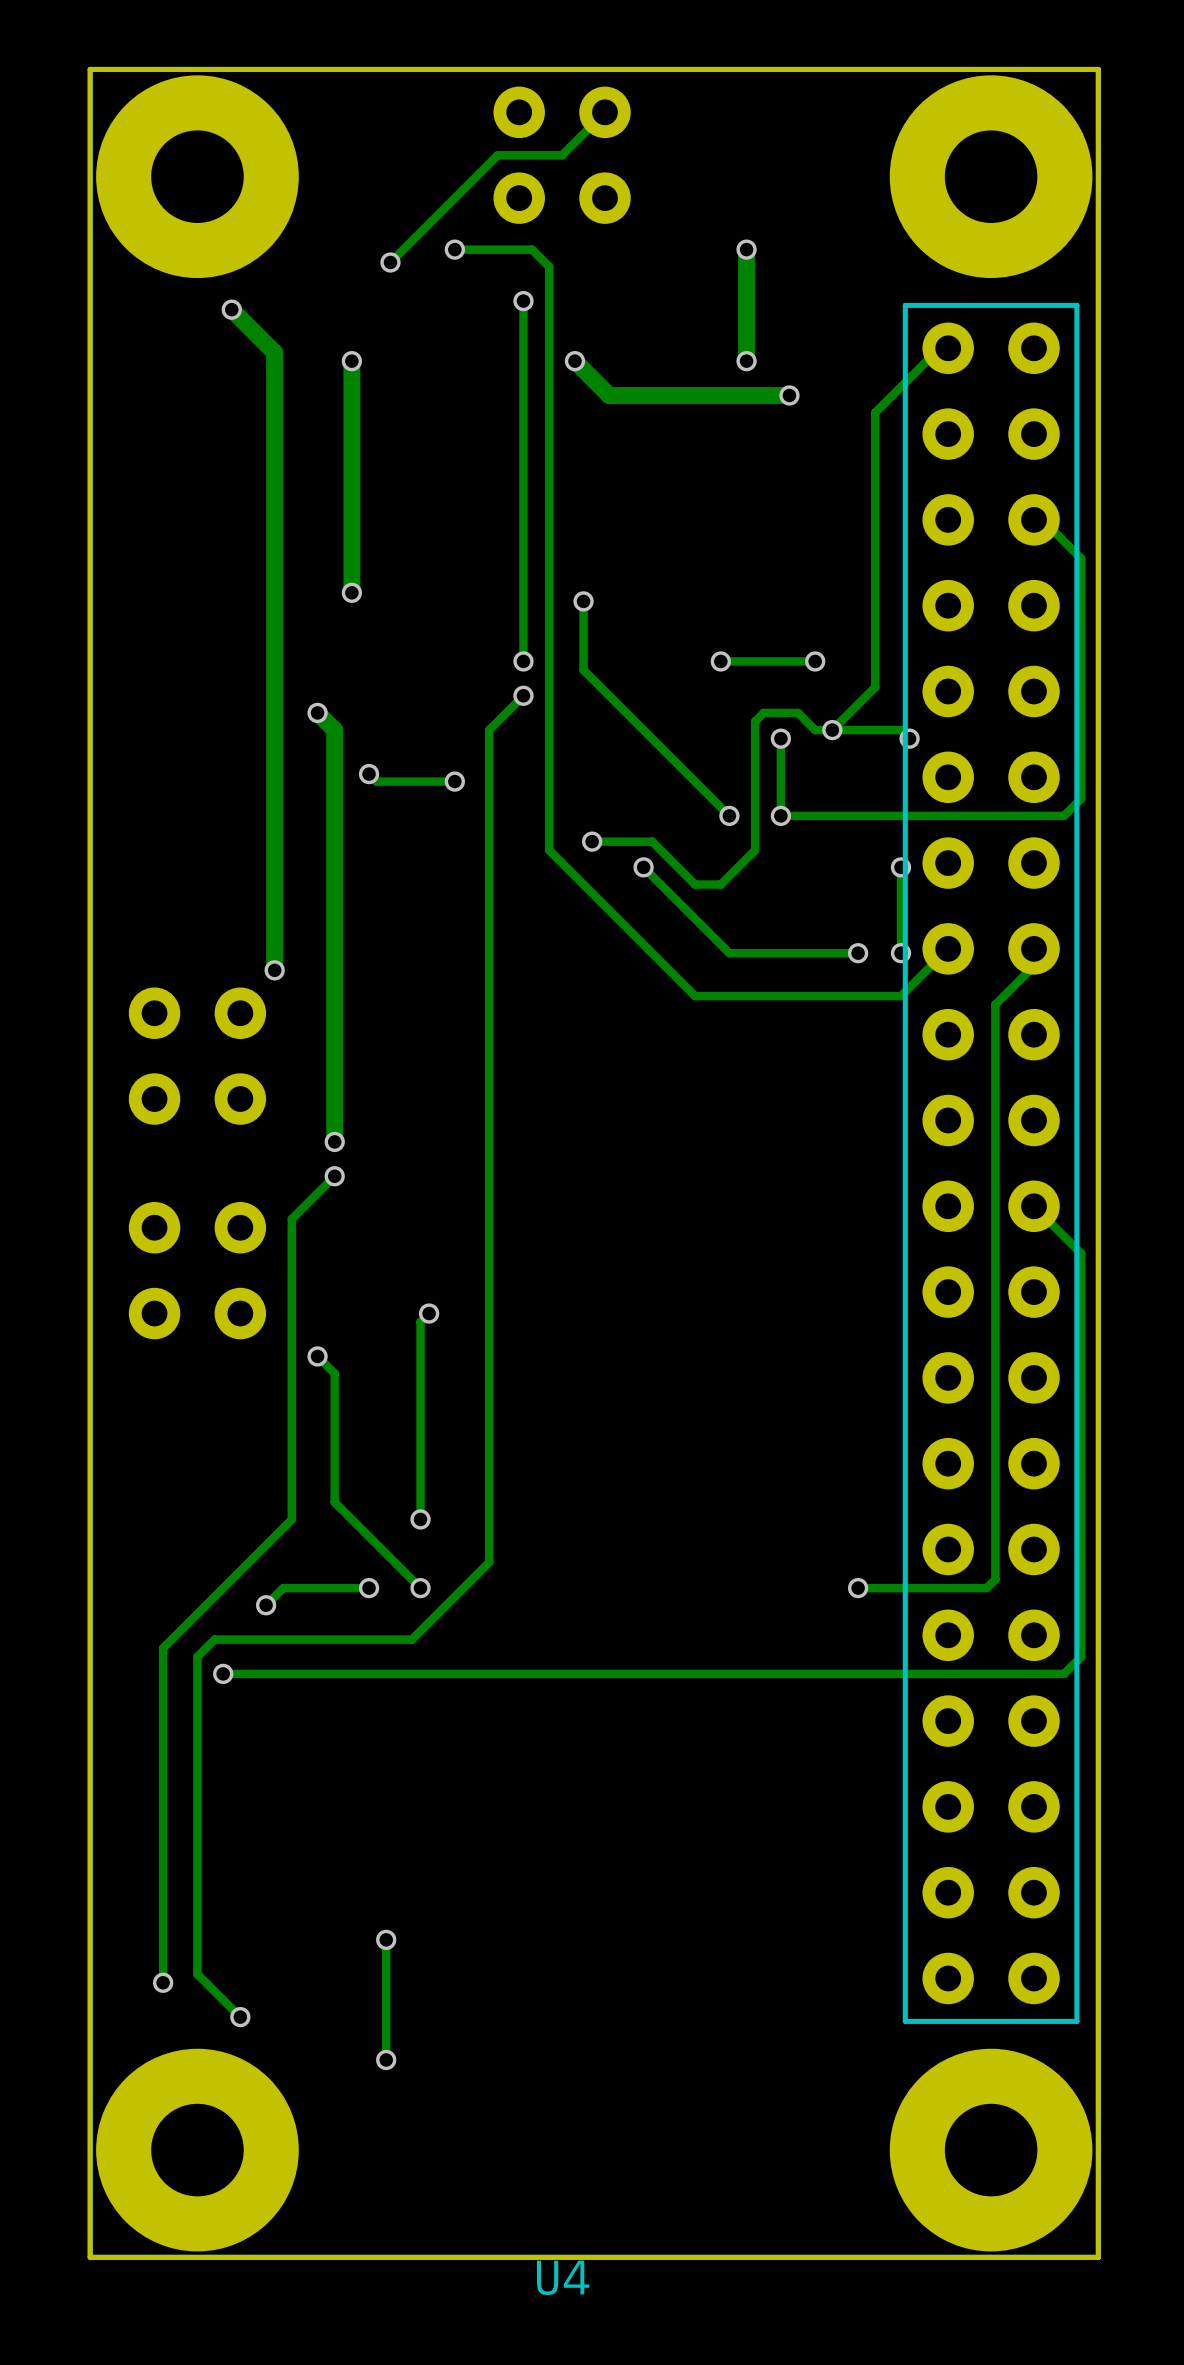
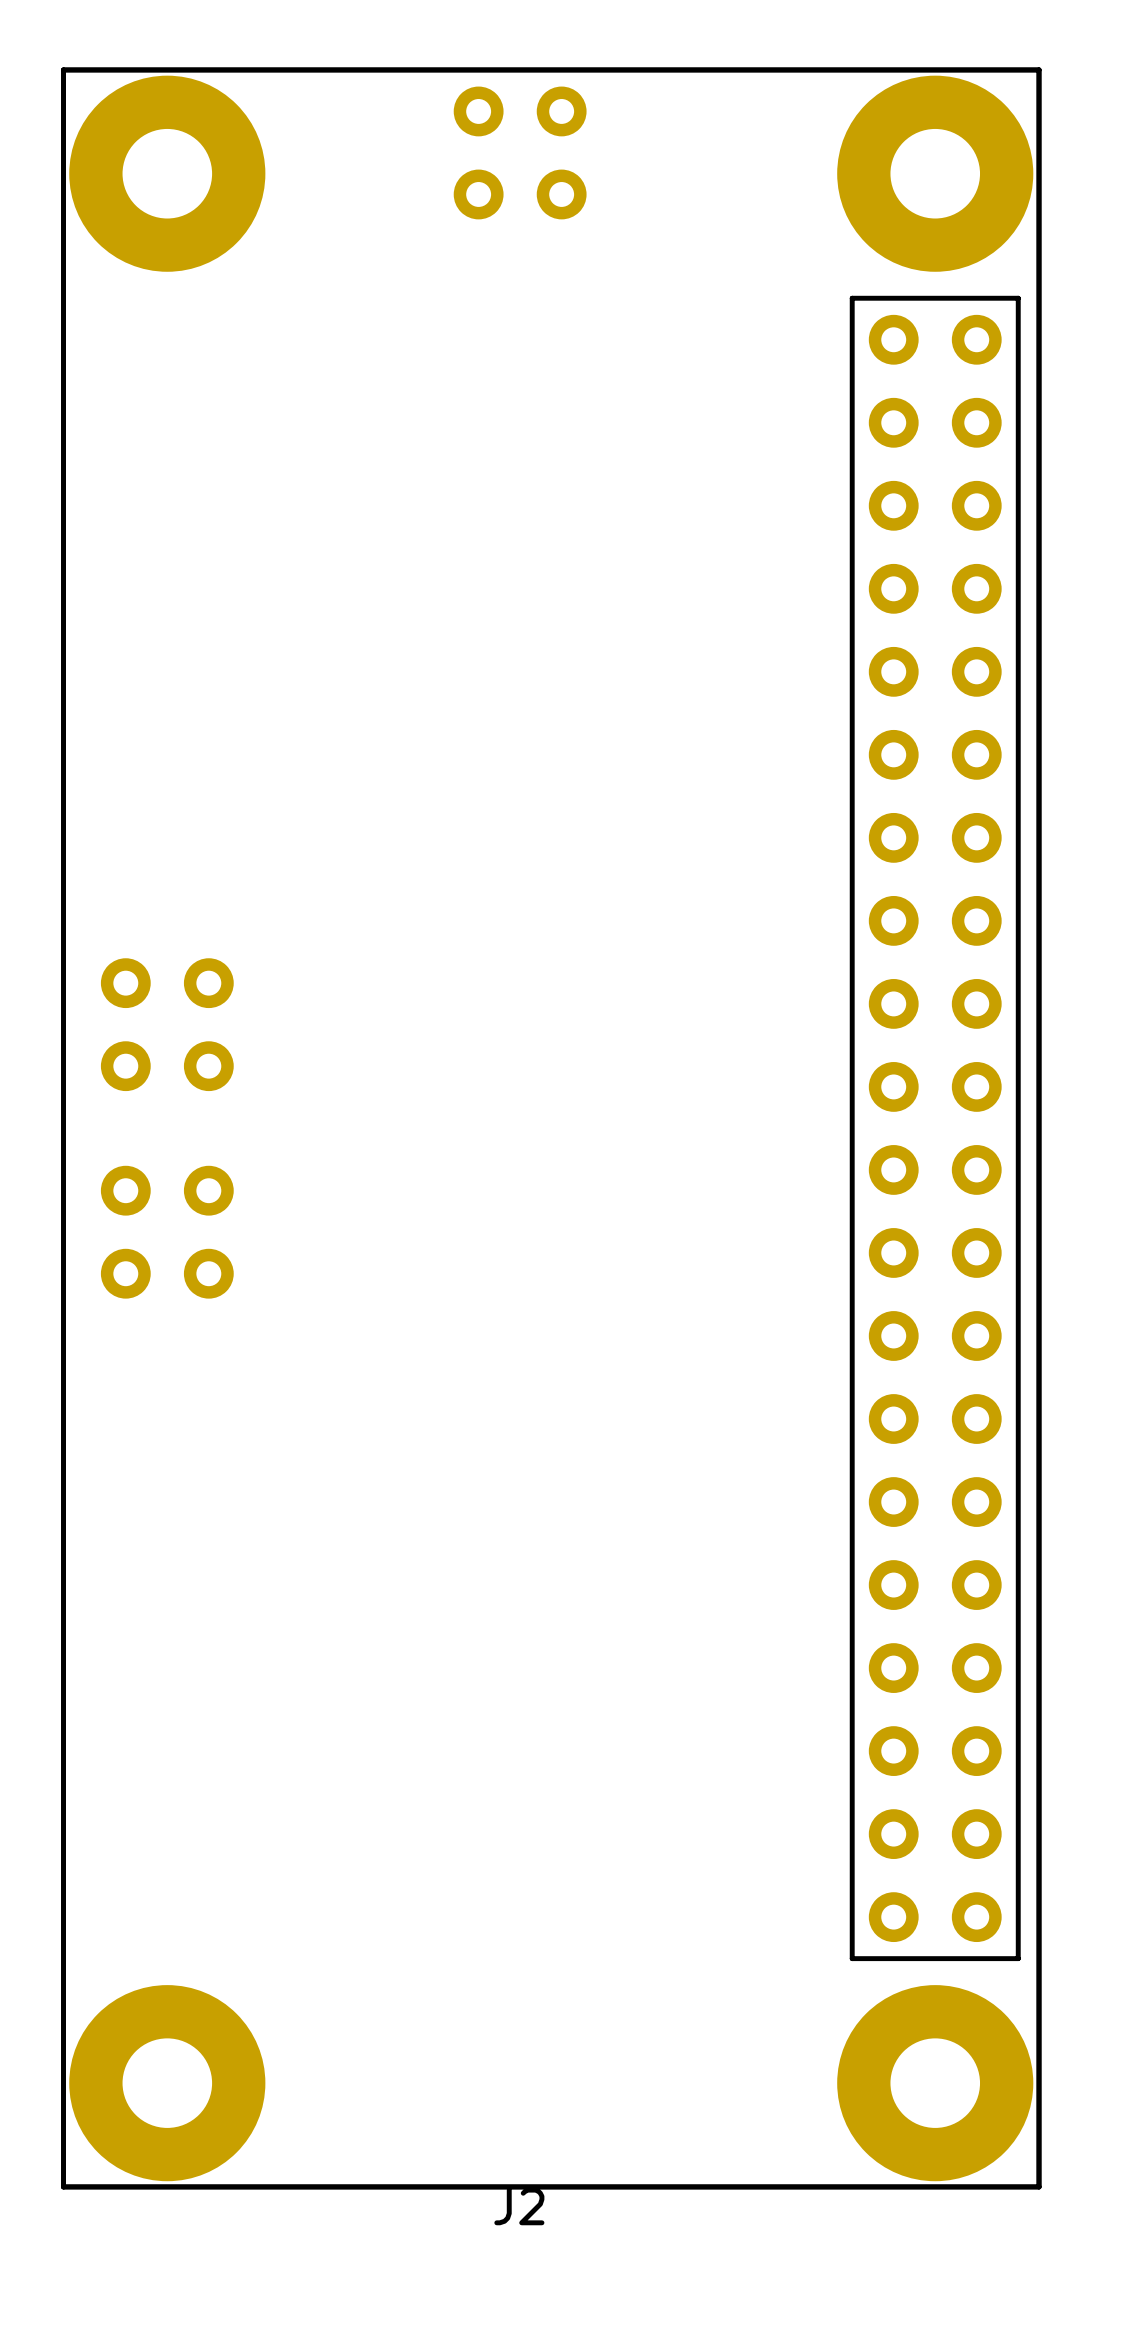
track: (605, 112) (562, 155) (497, 155) (390, 262) -> none
track: (454, 249) (532, 249) (549, 266) (549, 850) (695, 996) (901, 996) (948, 948) -> none
via: (454, 249) -> none
track: (746, 249) (746, 361) -> none
via: (746, 249) -> none
via: (390, 262) -> none
track: (523, 301) (523, 661) -> none
via: (523, 301) -> none
track: (231, 309) (274, 352) (274, 970) -> none
via: (231, 309) -> none
track: (948, 348) (939, 348) (875, 412) (875, 687) (832, 730) -> none
track: (351, 361) (351, 592) -> none
via: (351, 361) -> none
track: (574, 361) (609, 395) (789, 395) -> none
via: (574, 361) -> none
via: (746, 361) -> none
via: (789, 395) -> none
track: (1034, 519) (1042, 519) (1081, 558) (1081, 798) (1064, 815) (780, 815) (780, 738) -> none
via: (351, 592) -> none
track: (583, 601) (583, 670) (729, 815) -> none
via: (583, 601) -> none
via: (523, 661) -> none
via: (720, 661) -> none
track: (815, 661) (720, 661) -> none
via: (815, 661) -> none
track: (523, 695) (489, 730) (489, 1562) (411, 1639) (214, 1639) (197, 1656) (197, 1974) (240, 2017) -> none
via: (523, 695) -> none
track: (317, 712) (334, 730) (334, 1141) -> none
via: (317, 712) -> none
via: (832, 730) -> none
via: (780, 738) -> none
track: (909, 738) (901, 730) (815, 730) (798, 712) (763, 712) (755, 721) (755, 850) (720, 884) (695, 884) (652, 841) (592, 841) -> none
via: (909, 738) -> none
track: (369, 774) (376, 781) (454, 781) -> none
via: (369, 774) -> none
via: (454, 781) -> none
via: (729, 815) -> none
via: (780, 815) -> none
via: (592, 841) -> none
track: (643, 867) (729, 953) (858, 953) -> none
via: (643, 867) -> none
track: (901, 867) (901, 953) -> none
via: (901, 867) -> none
track: (1034, 948) (1034, 966) (995, 1004) (995, 1579) (986, 1588) (858, 1588) -> none
via: (858, 953) -> none
via: (901, 953) -> none
via: (274, 970) -> none
via: (334, 1141) -> none
track: (334, 1176) (291, 1219) (291, 1519) (163, 1648) (163, 1982) -> none
via: (334, 1176) -> none
track: (1034, 1206) (1081, 1253) (1081, 1656) (1064, 1673) (223, 1673) -> none
track: (429, 1313) (420, 1322) (420, 1519) -> none
via: (429, 1313) -> none
track: (317, 1356) (334, 1373) (334, 1502) (420, 1588) -> none
via: (317, 1356) -> none
via: (420, 1519) -> none
track: (369, 1588) (283, 1588) (266, 1605) -> none
via: (369, 1588) -> none
via: (420, 1588) -> none
via: (858, 1588) -> none
via: (266, 1605) -> none
via: (223, 1673) -> none
track: (386, 1939) (386, 2059) -> none
via: (386, 1939) -> none
via: (163, 1982) -> none
via: (240, 2017) -> none
via: (386, 2059) -> none
U4 name: U4 (563, 2277) -> J2 (519, 2206)

